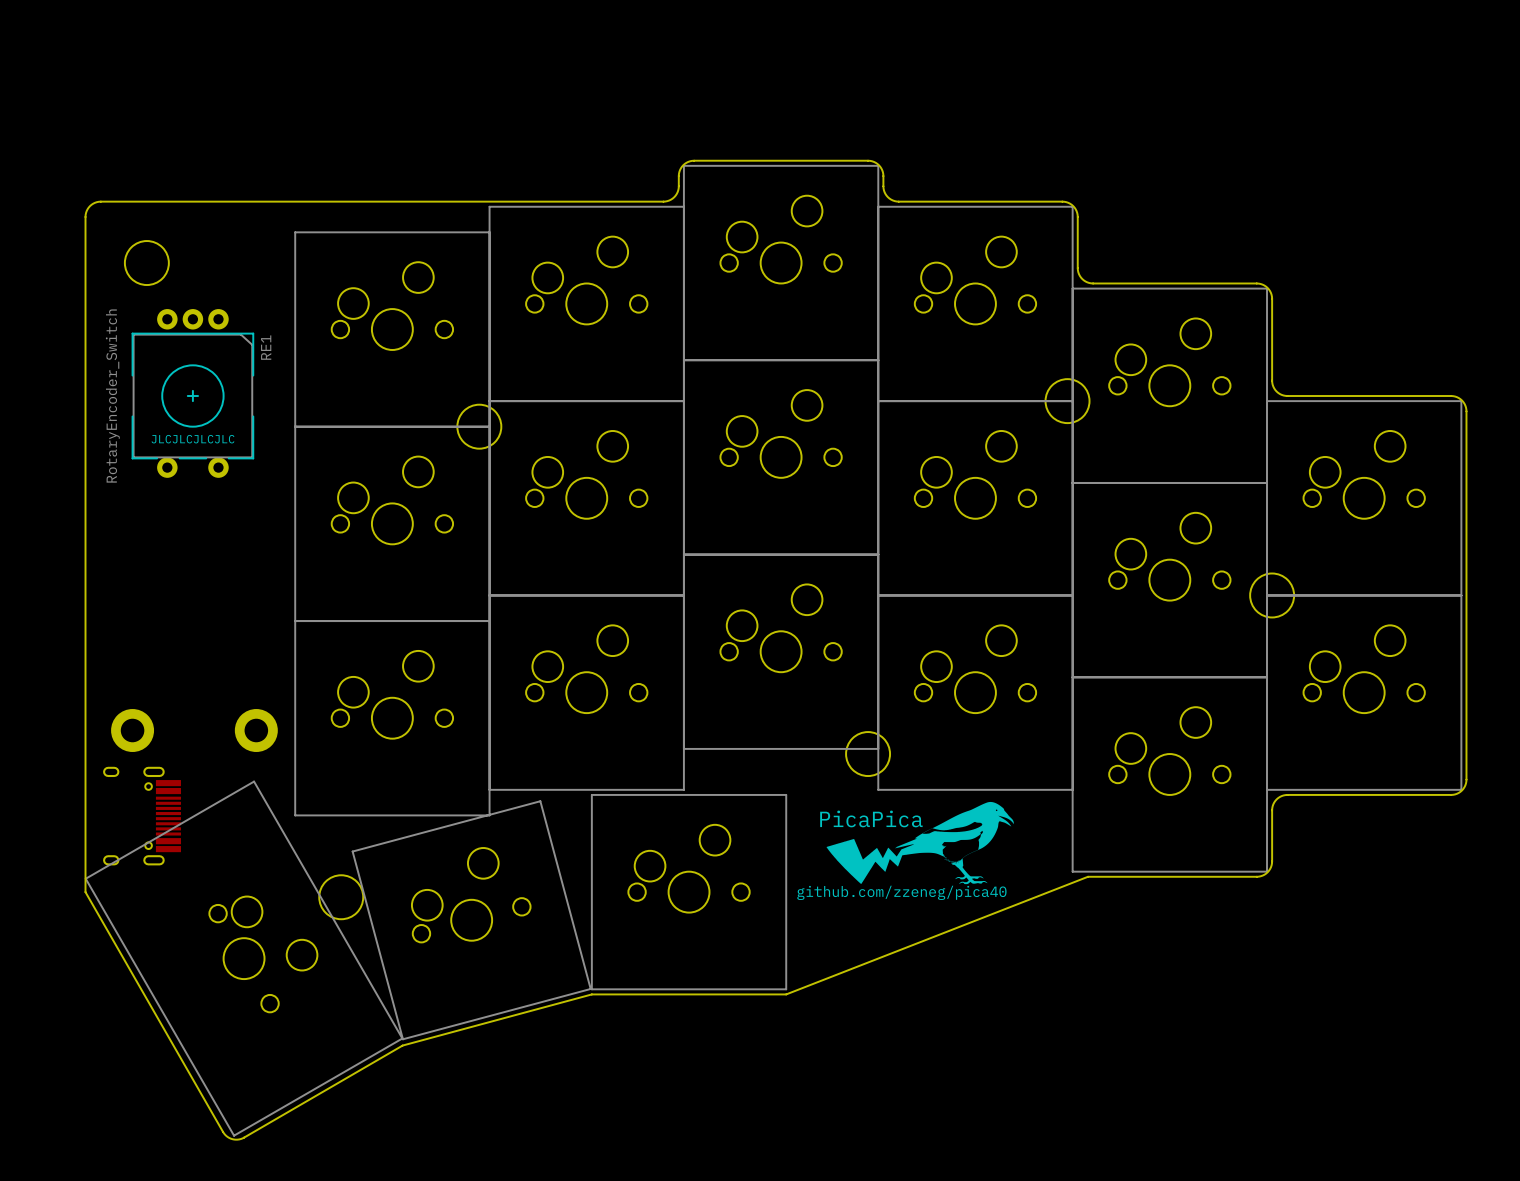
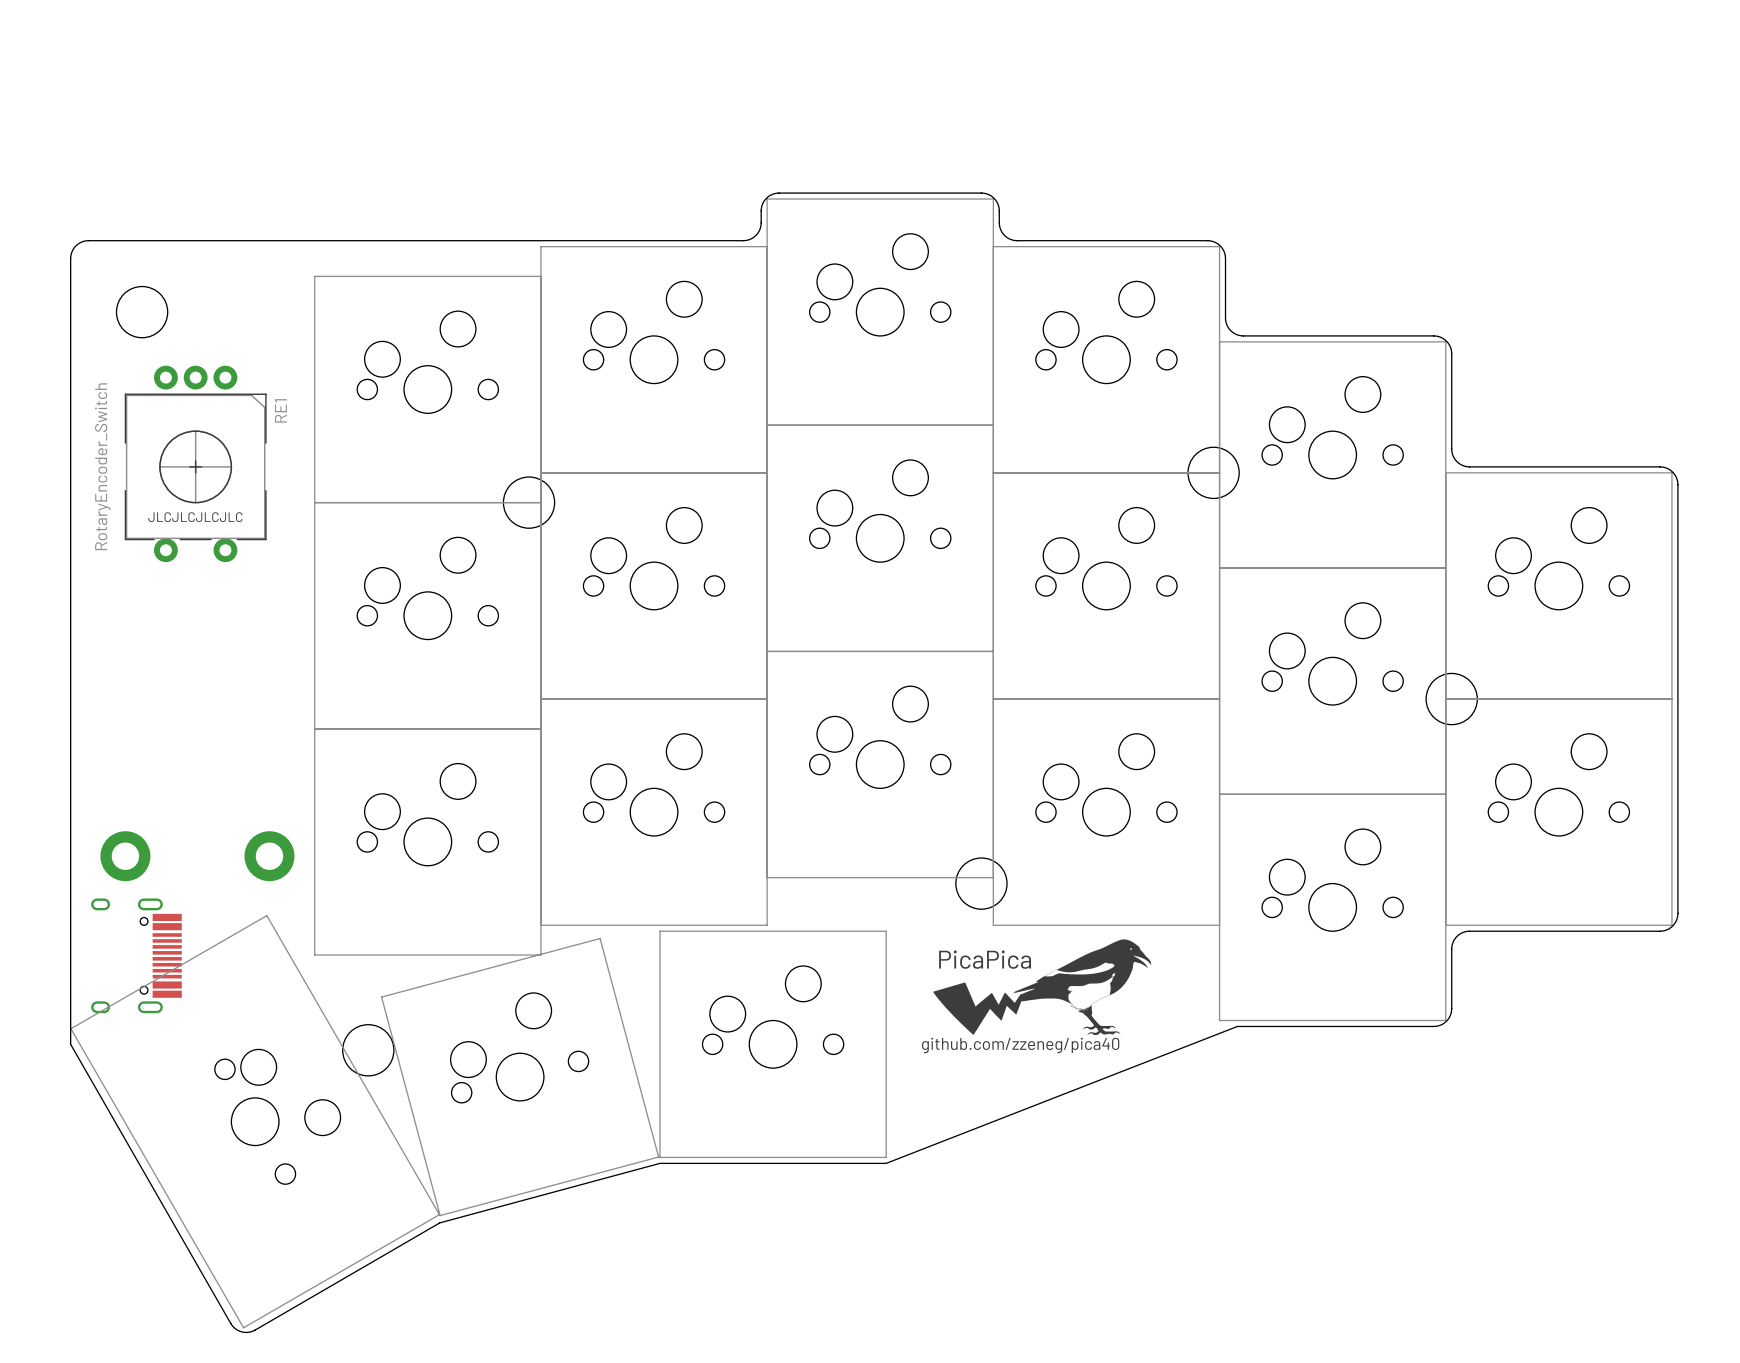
RE1 footprint: [131, 309, 254, 478] -> [120, 365, 272, 563]

